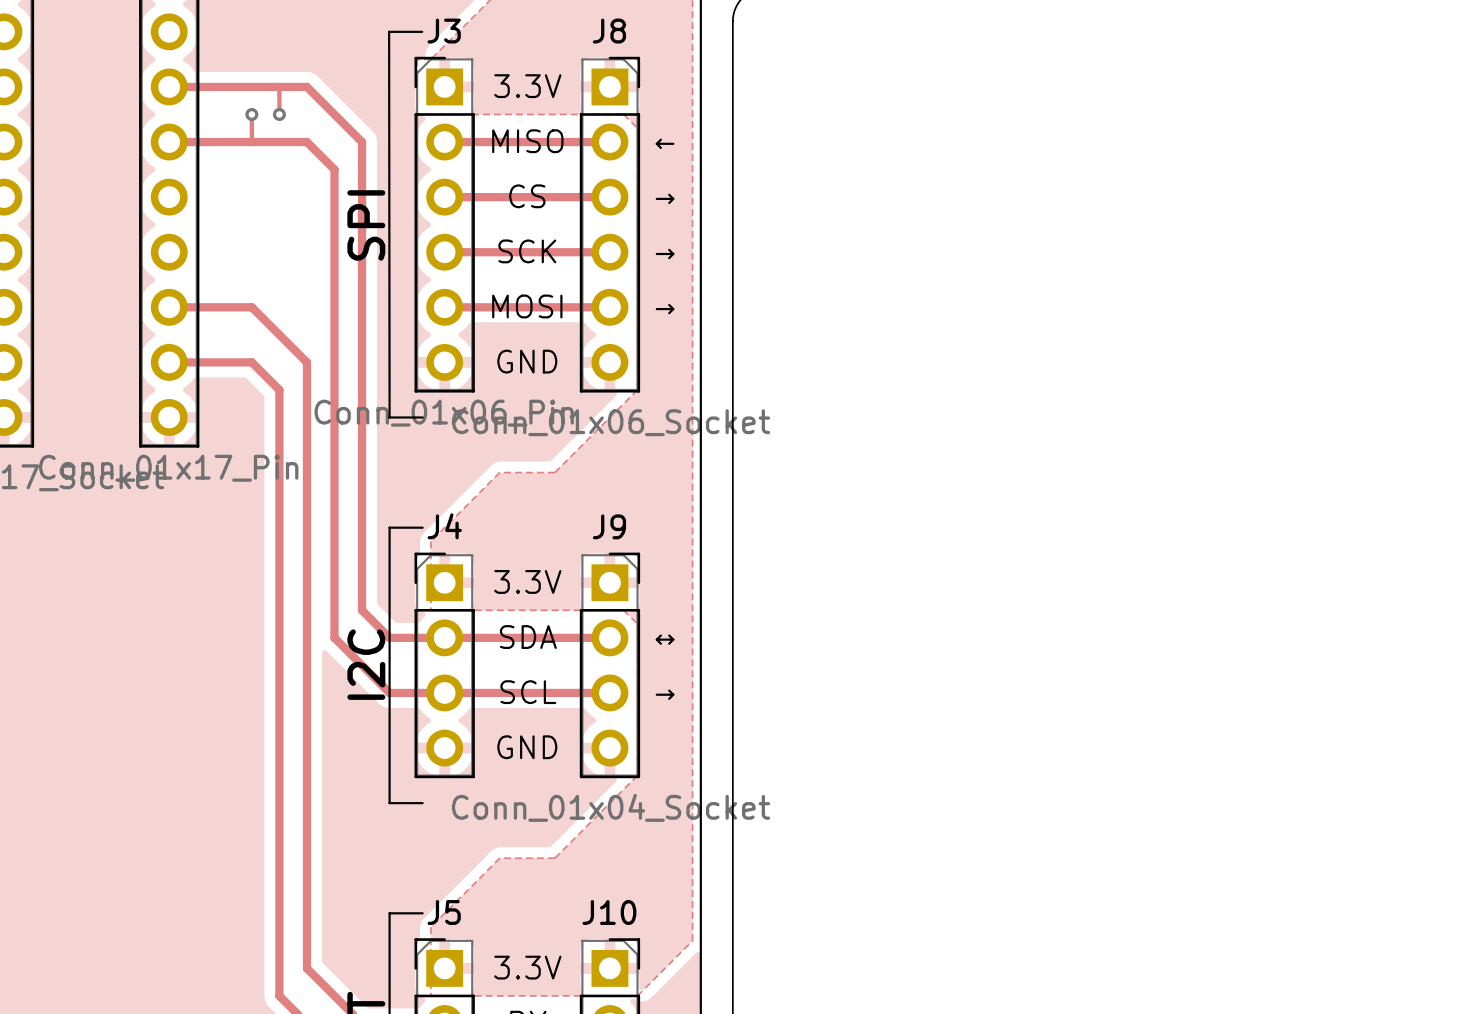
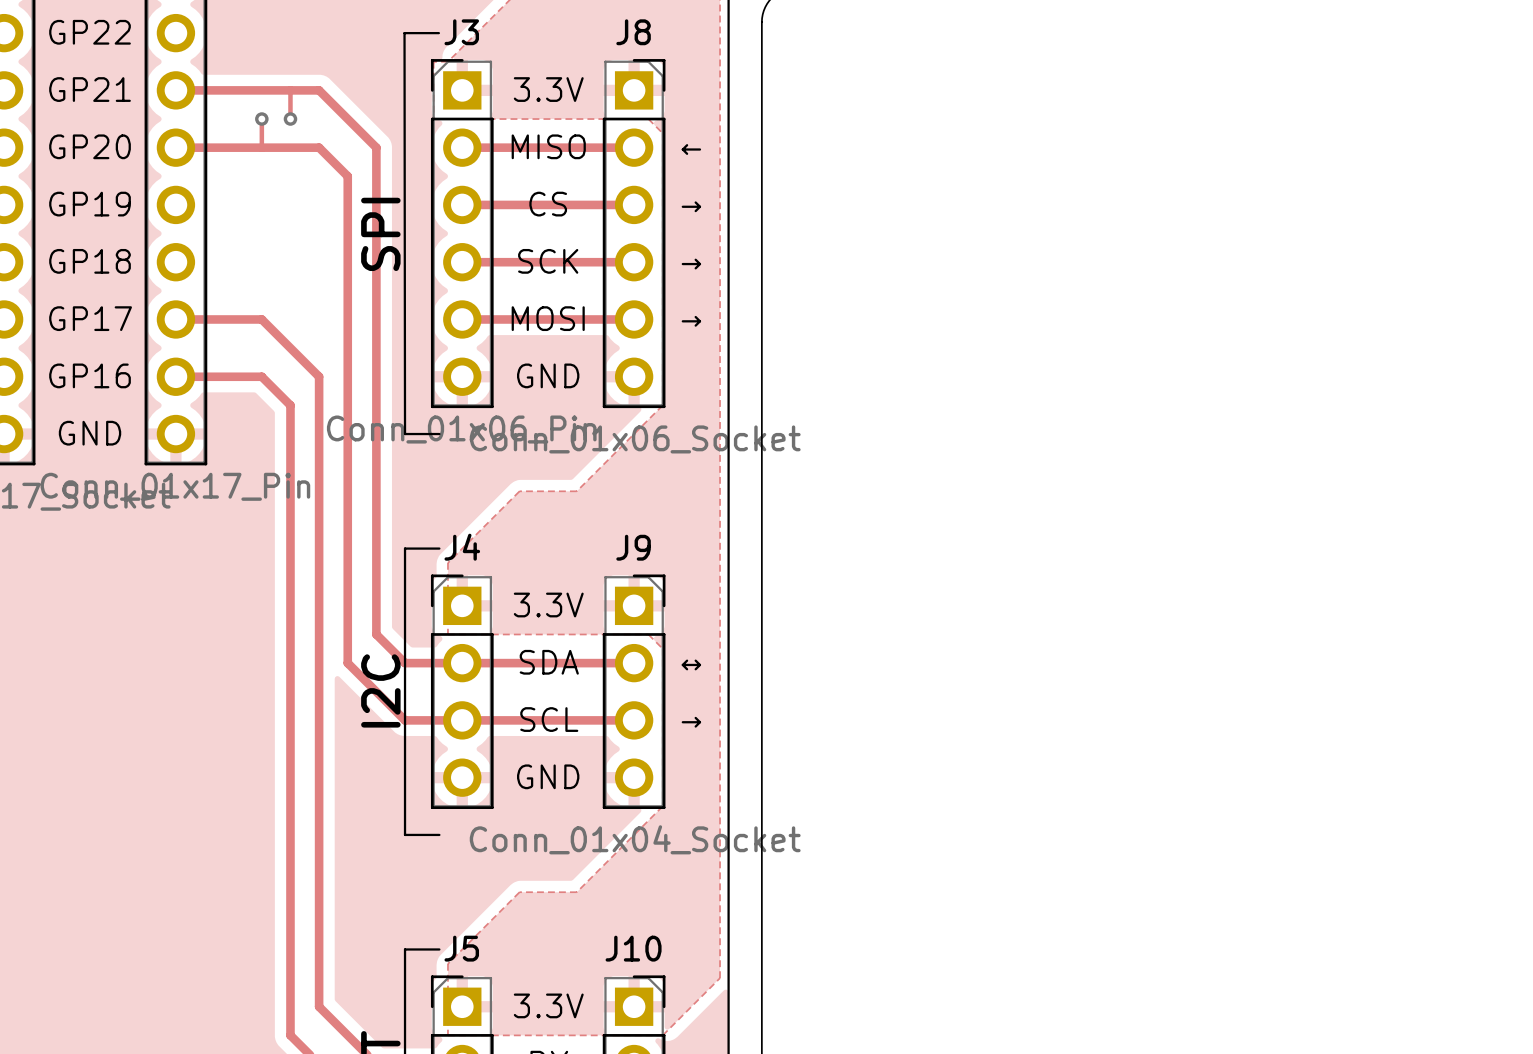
text: none -> GP22 (90, 32)
text: none -> GP21 (90, 89)
text: none -> GP20 (90, 146)
text: none -> GP19 (90, 204)
text: none -> GP18 (90, 261)
text: none -> GP17 (90, 318)
text: none -> GP16 (90, 375)
text: none -> GND (90, 433)

